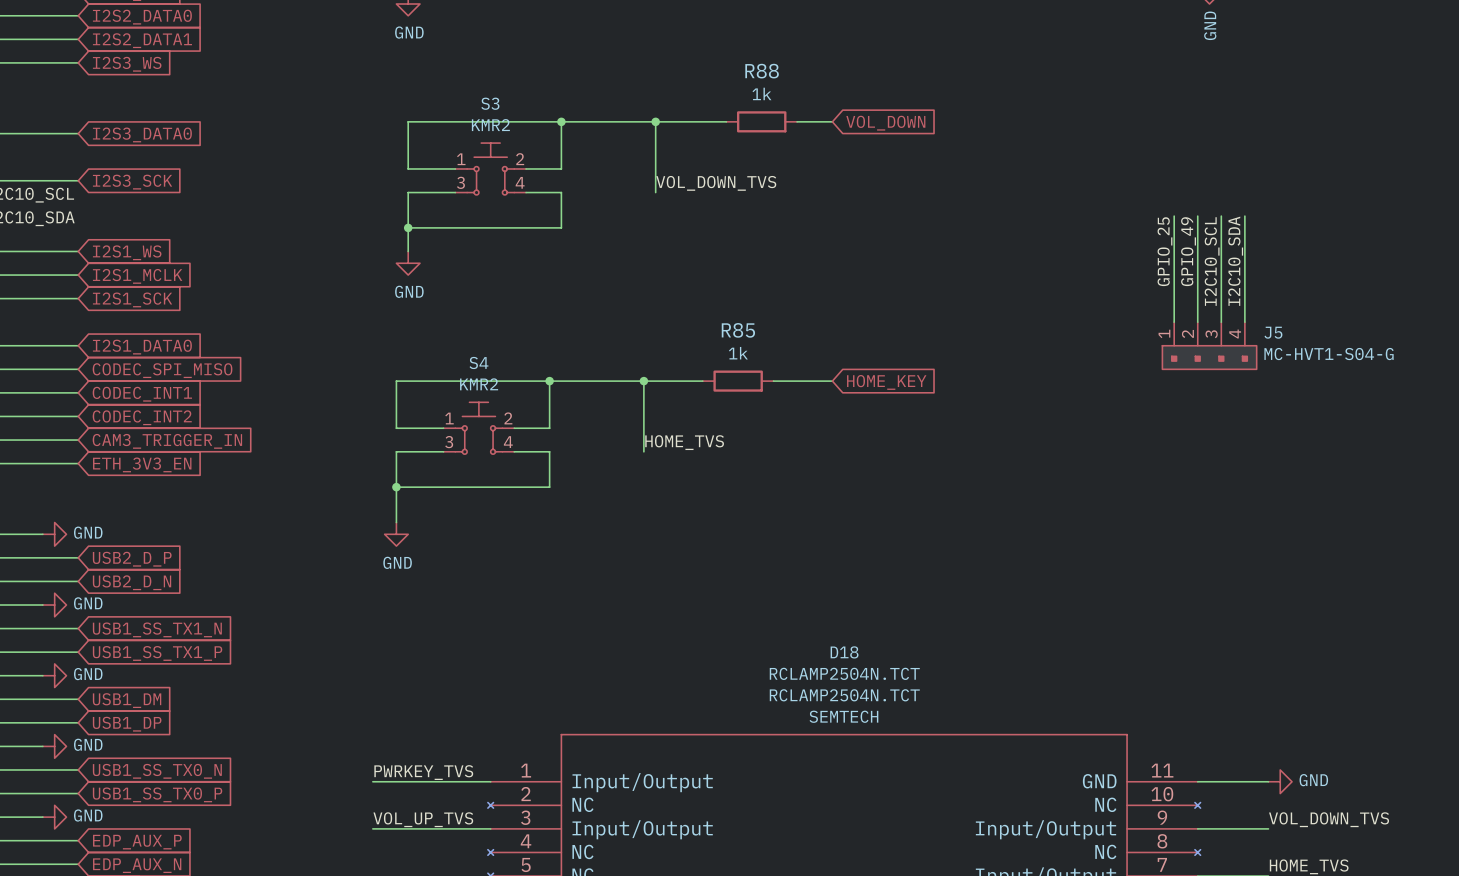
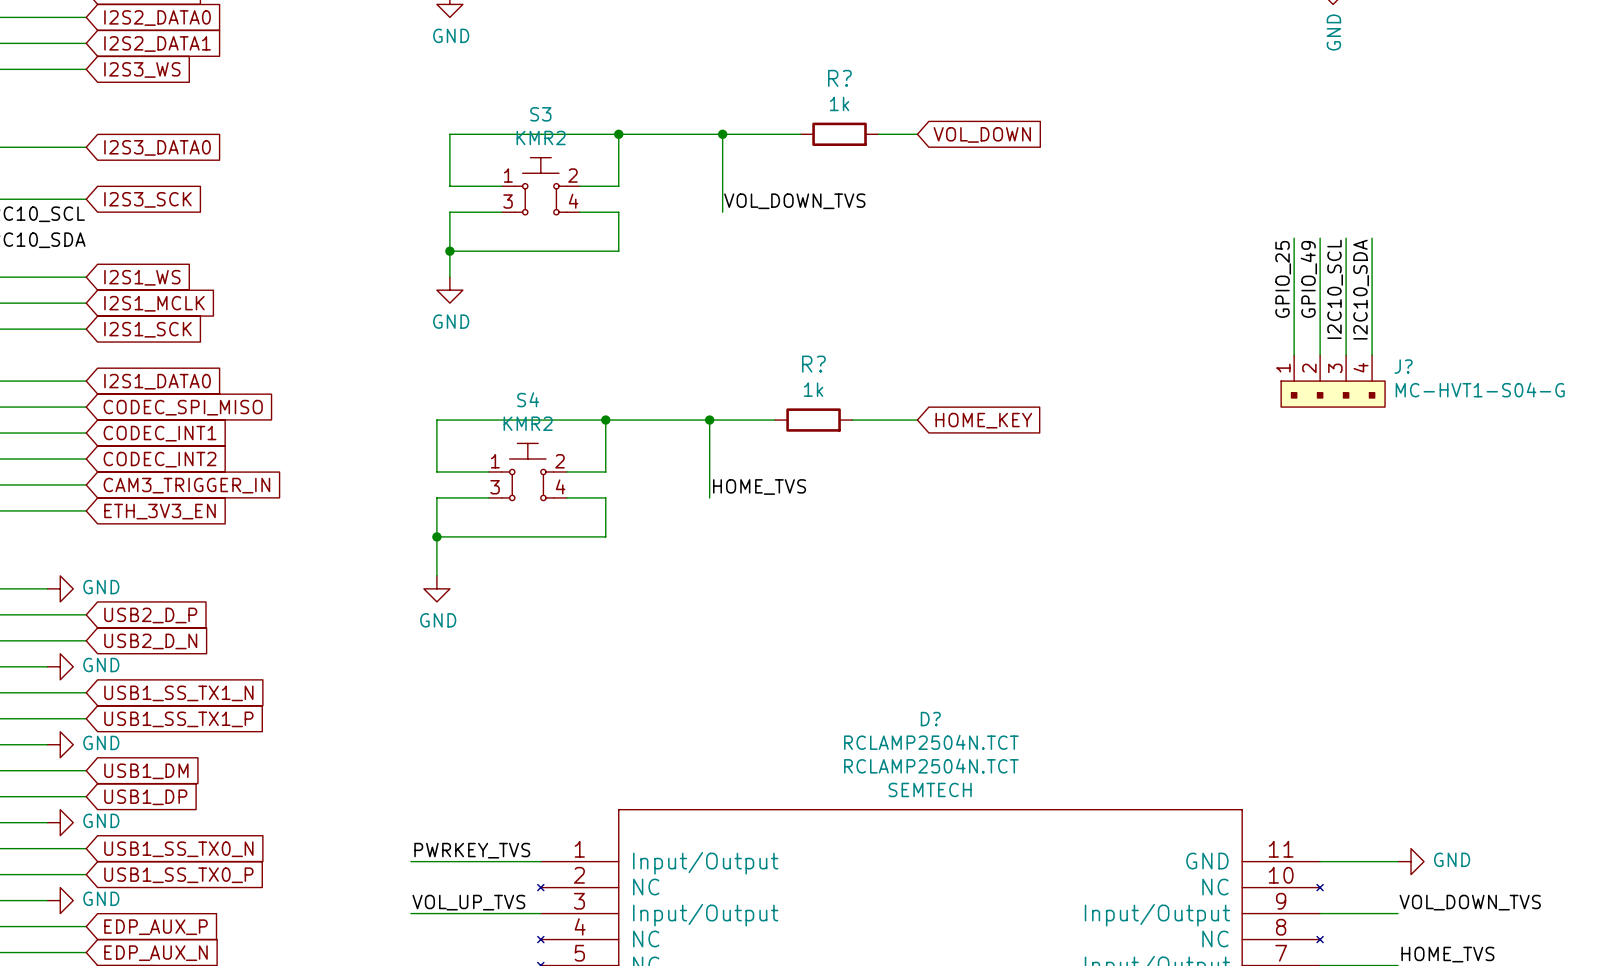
R88 name: R88 (762, 71) -> R? (839, 78)
R85 name: R85 (738, 330) -> R? (813, 364)
J5 name: J5 (1273, 332) -> J? (1403, 366)
D18 name: D18 (844, 652) -> D? (930, 719)

